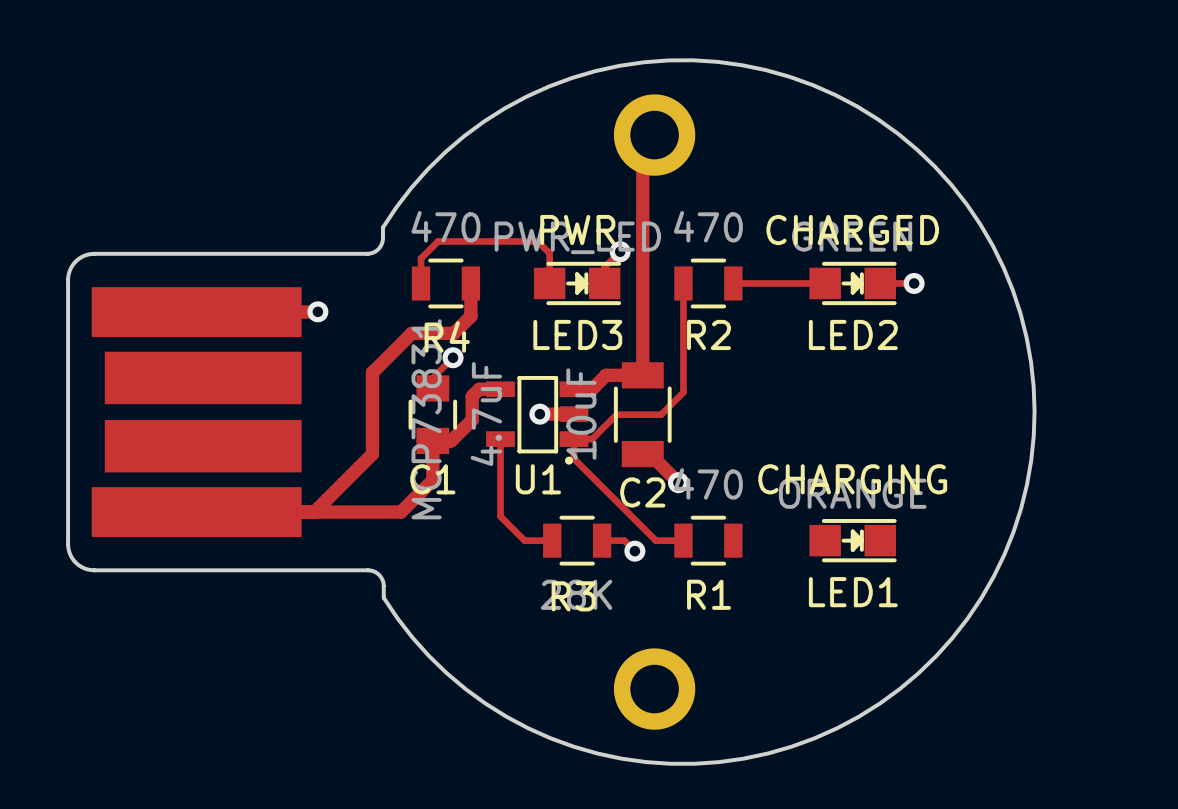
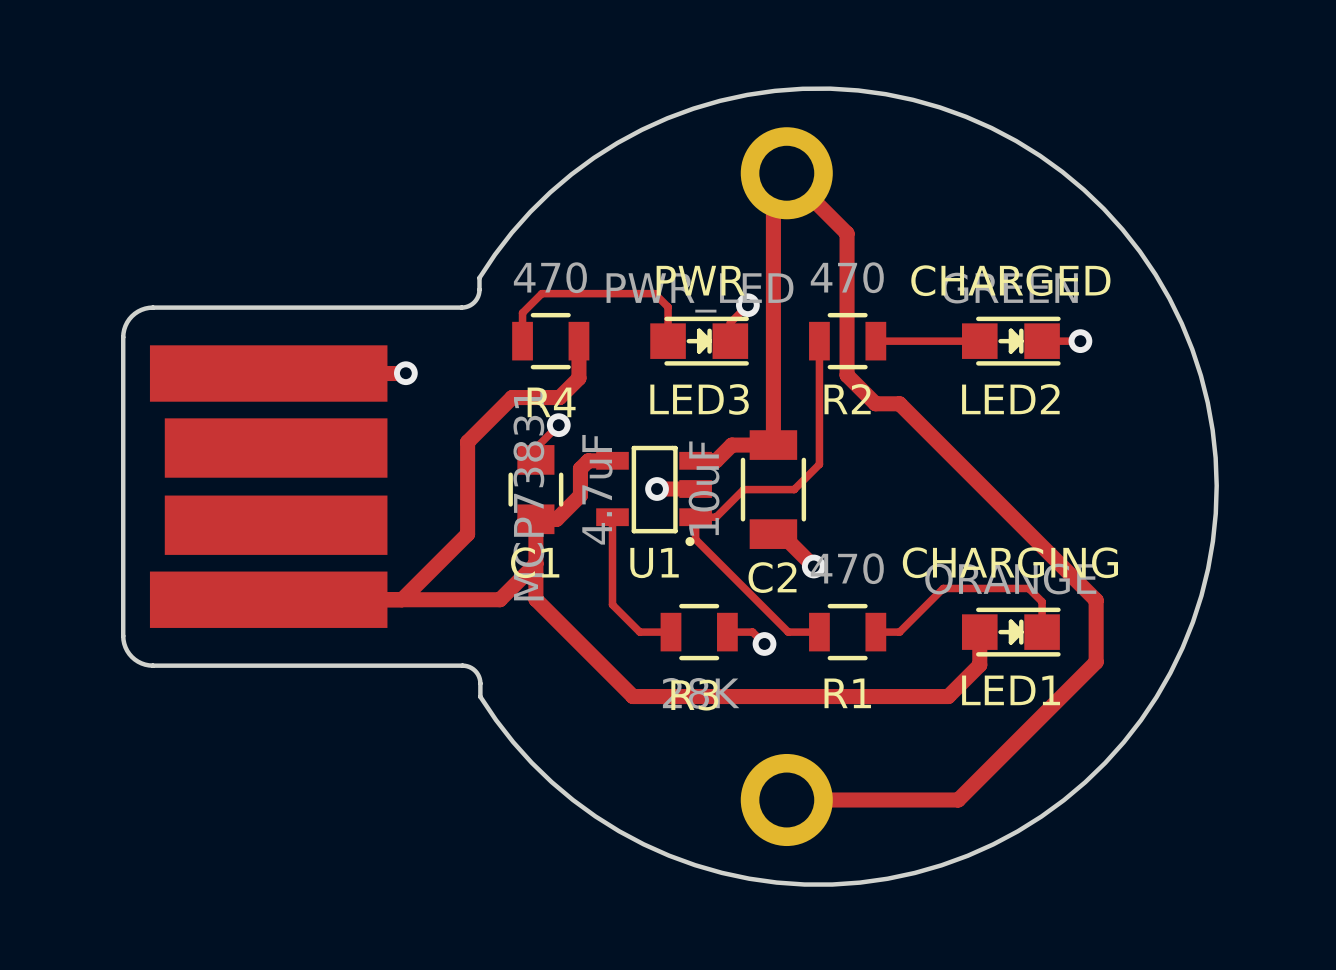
track: none -> (786, 173) (847, 233) (847, 375) (875, 403) (899, 403) (1096, 600) (1096, 662) (958, 800) (786, 800)
track: none -> (535, 563) (535, 599) (632, 696) (948, 696) (979, 665) (979, 632)
track: none -> (875, 632) (899, 632) (943, 588) (1028, 588) (1042, 601) (1042, 632)

